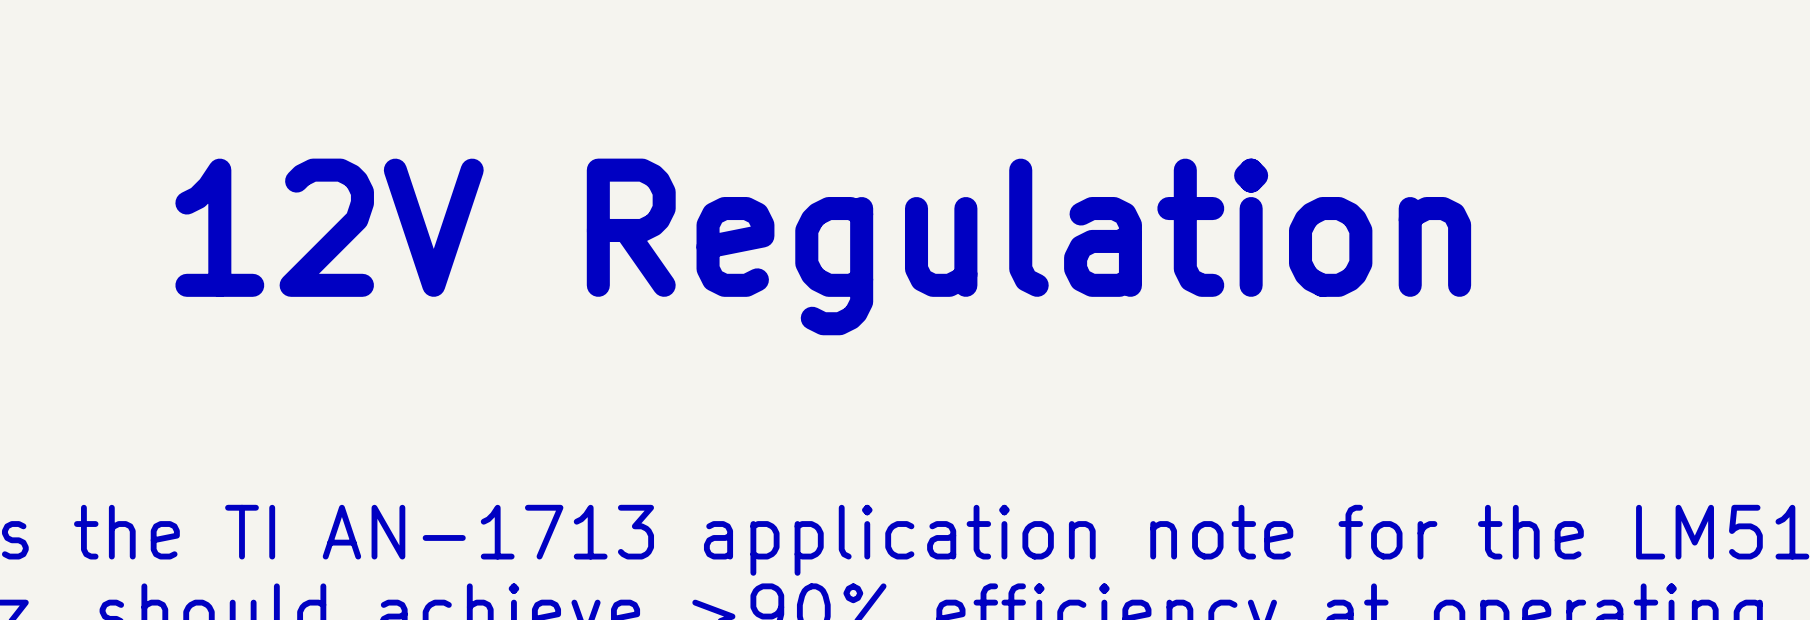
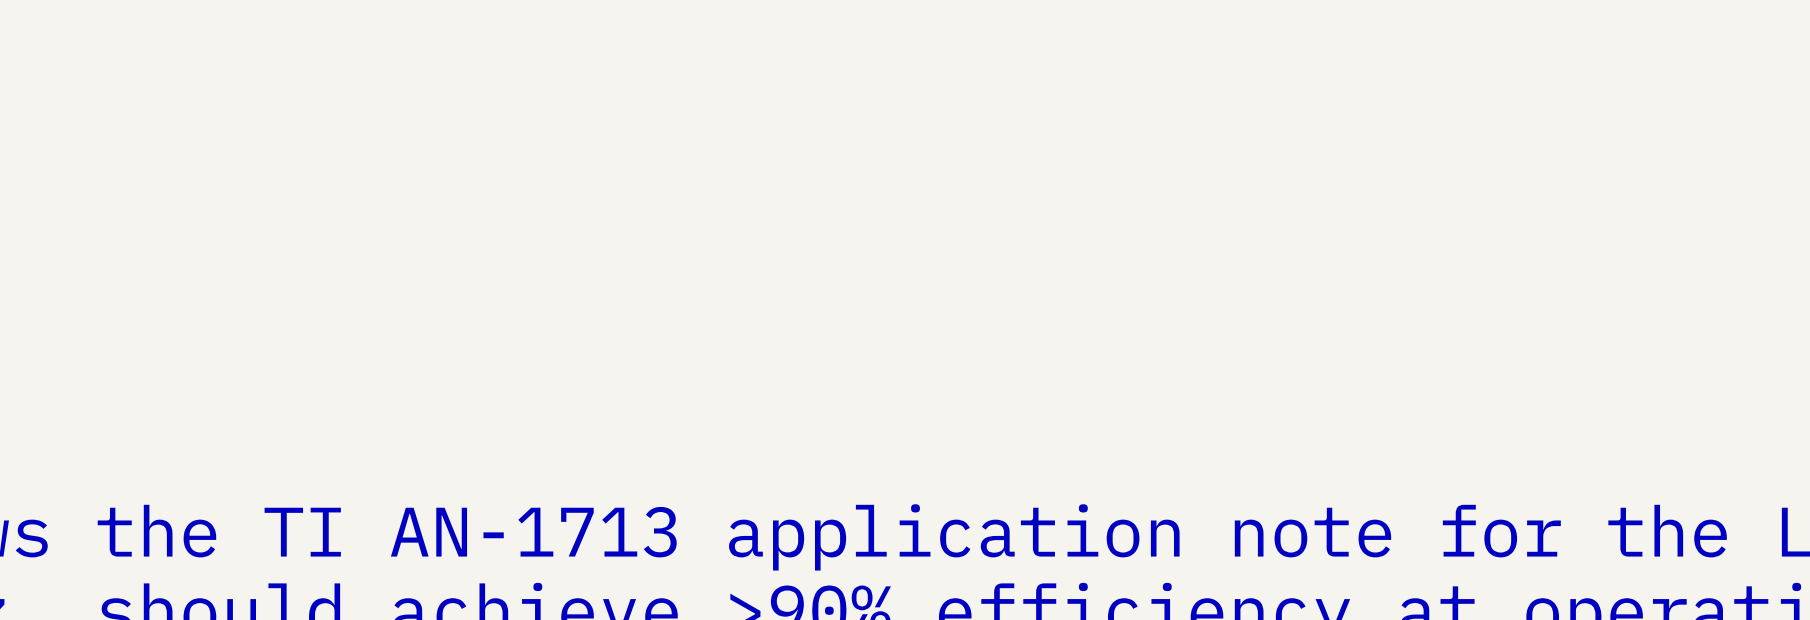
text: 12V Regulation (823, 246) -> none

